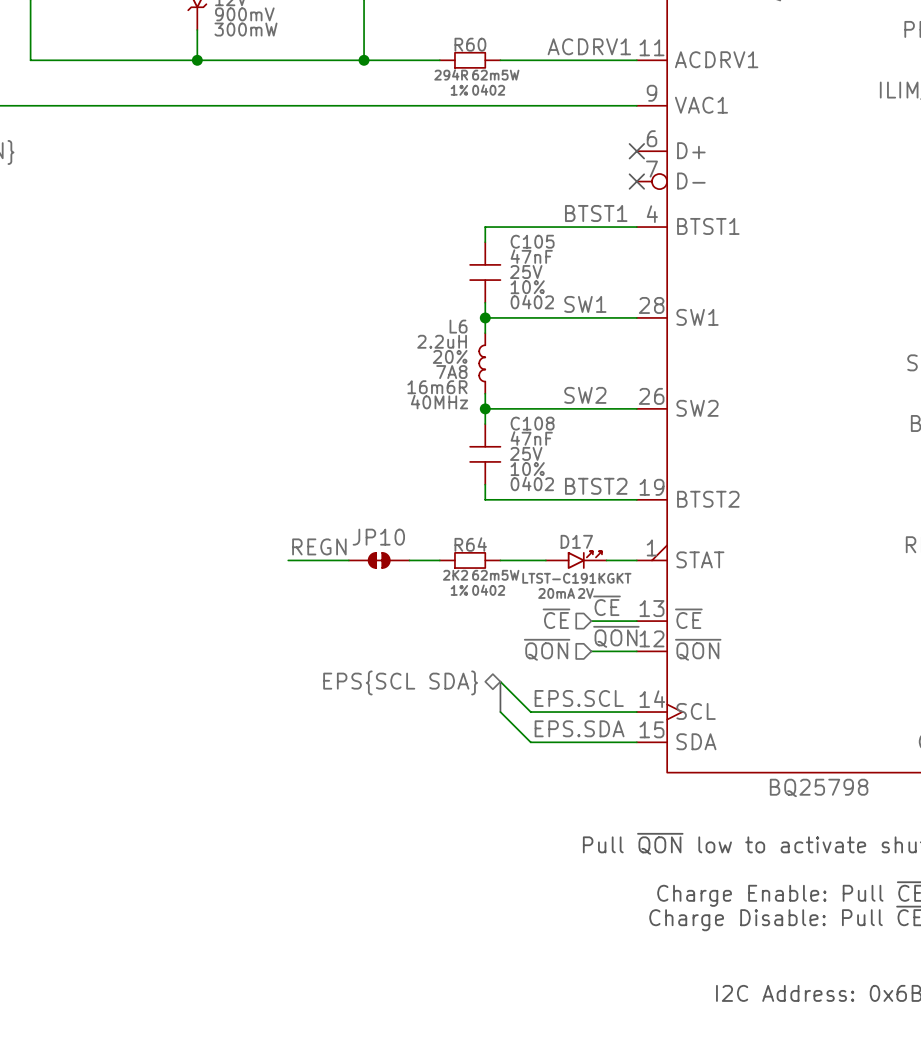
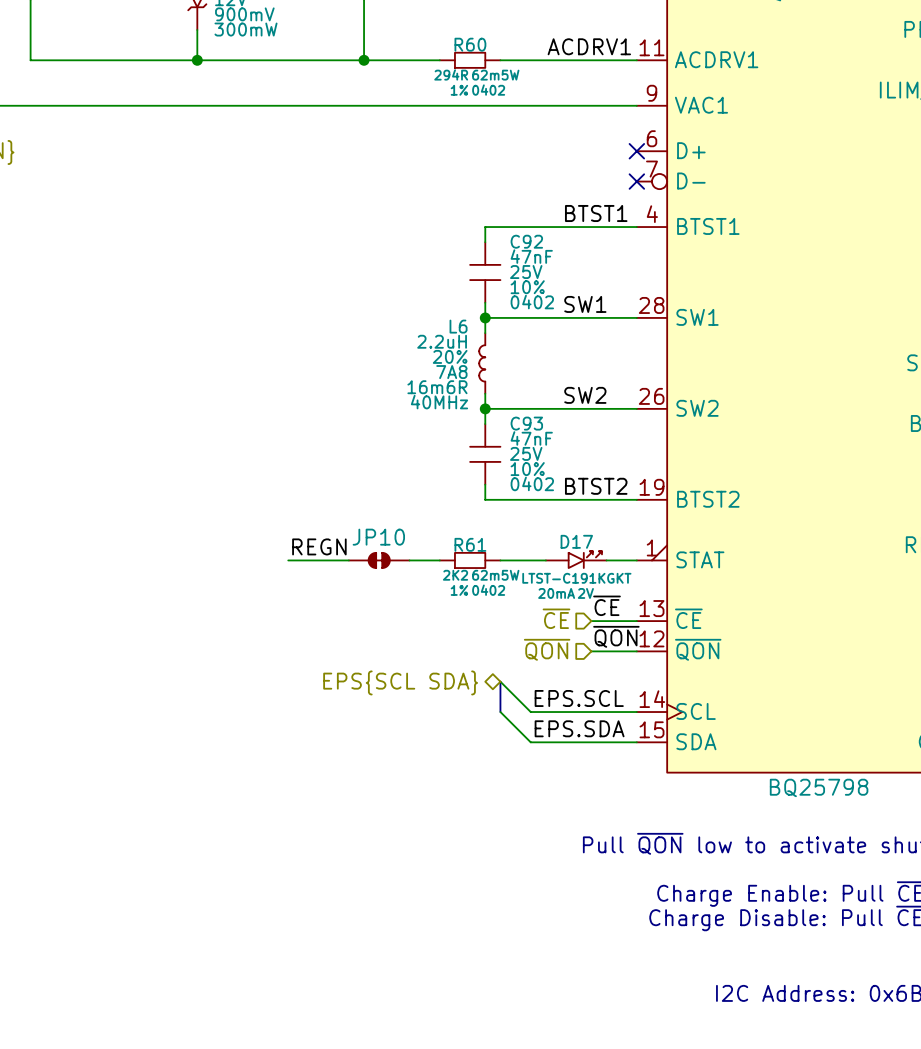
C105 name: C105 (532, 241) -> C92 (526, 241)
C108 name: C108 (532, 423) -> C93 (526, 423)
R64 name: R64 (470, 544) -> R61 (470, 544)

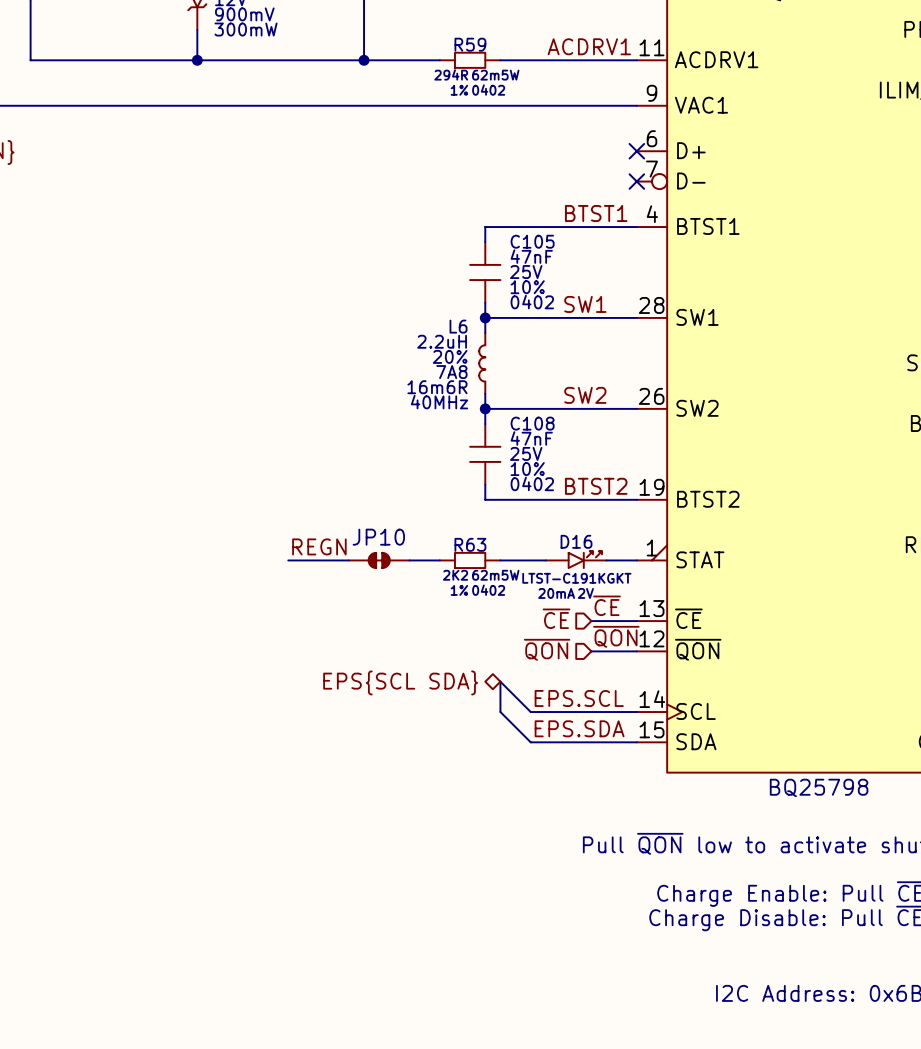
R60 name: R60 (470, 44) -> R59 (470, 44)
C92 name: C92 (526, 241) -> C105 (532, 241)
C93 name: C93 (526, 423) -> C108 (532, 423)
D17 name: D17 (576, 541) -> D16 (576, 541)
R61 name: R61 (470, 544) -> R63 (470, 544)

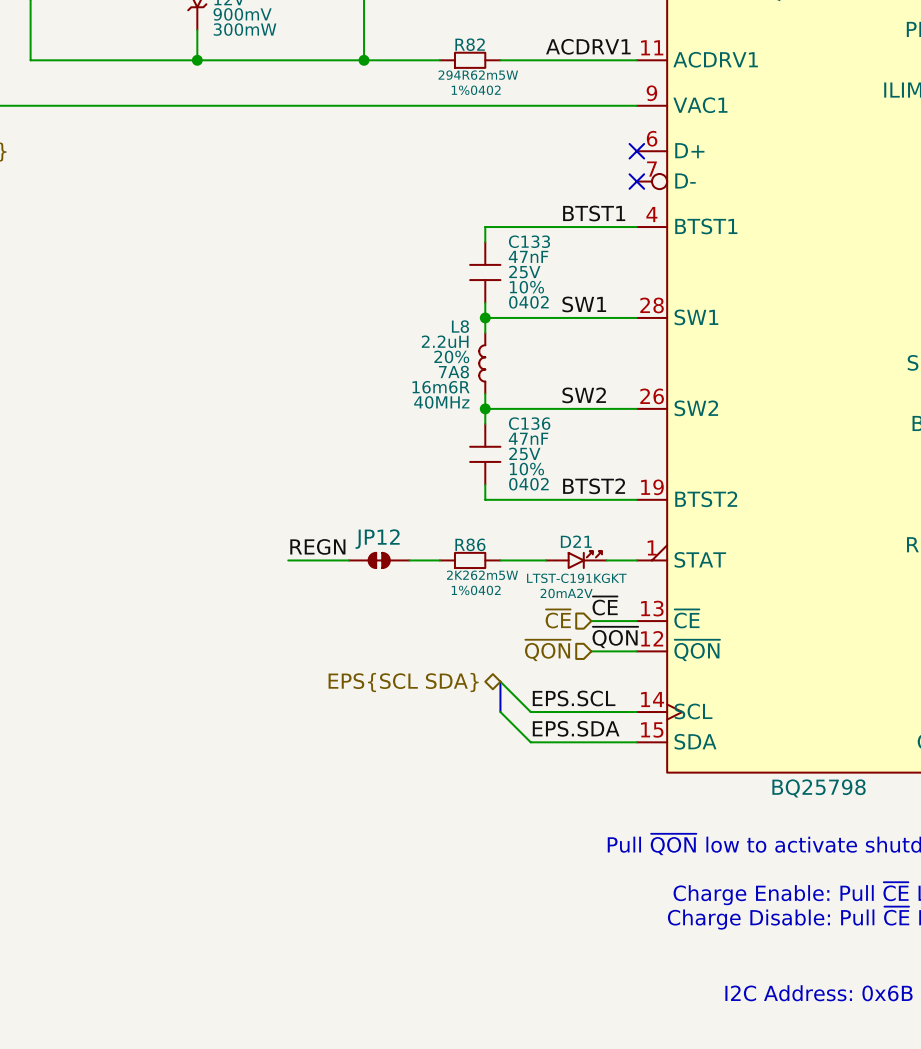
R59 name: R59 (470, 44) -> R82 (470, 44)
C105 name: C105 (532, 241) -> C133 (529, 241)
L6 name: L6 (458, 326) -> L8 (460, 326)
C108 name: C108 (532, 423) -> C136 (529, 423)
JP10 name: JP10 (378, 537) -> JP12 (377, 539)
D16 name: D16 (576, 541) -> D21 (576, 541)
R63 name: R63 (470, 544) -> R86 (470, 544)

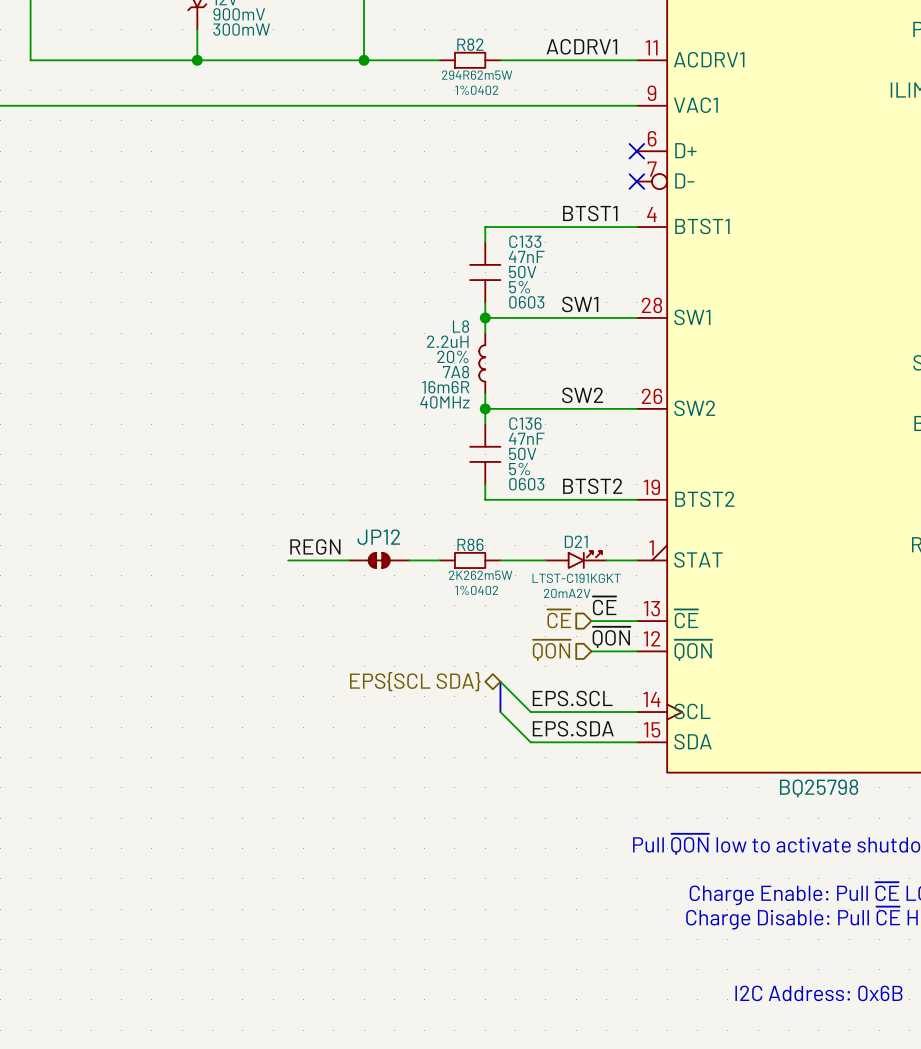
C133 text: 25V (524, 272) -> 50V (522, 272)
C133 text: 10% (526, 287) -> 5% (519, 287)
C133 text: 0402 (528, 302) -> 0603 (526, 302)
C136 text: 25V (524, 453) -> 50V (522, 453)
C136 text: 10% (526, 469) -> 5% (519, 469)
C136 text: 0402 (528, 484) -> 0603 (526, 484)

